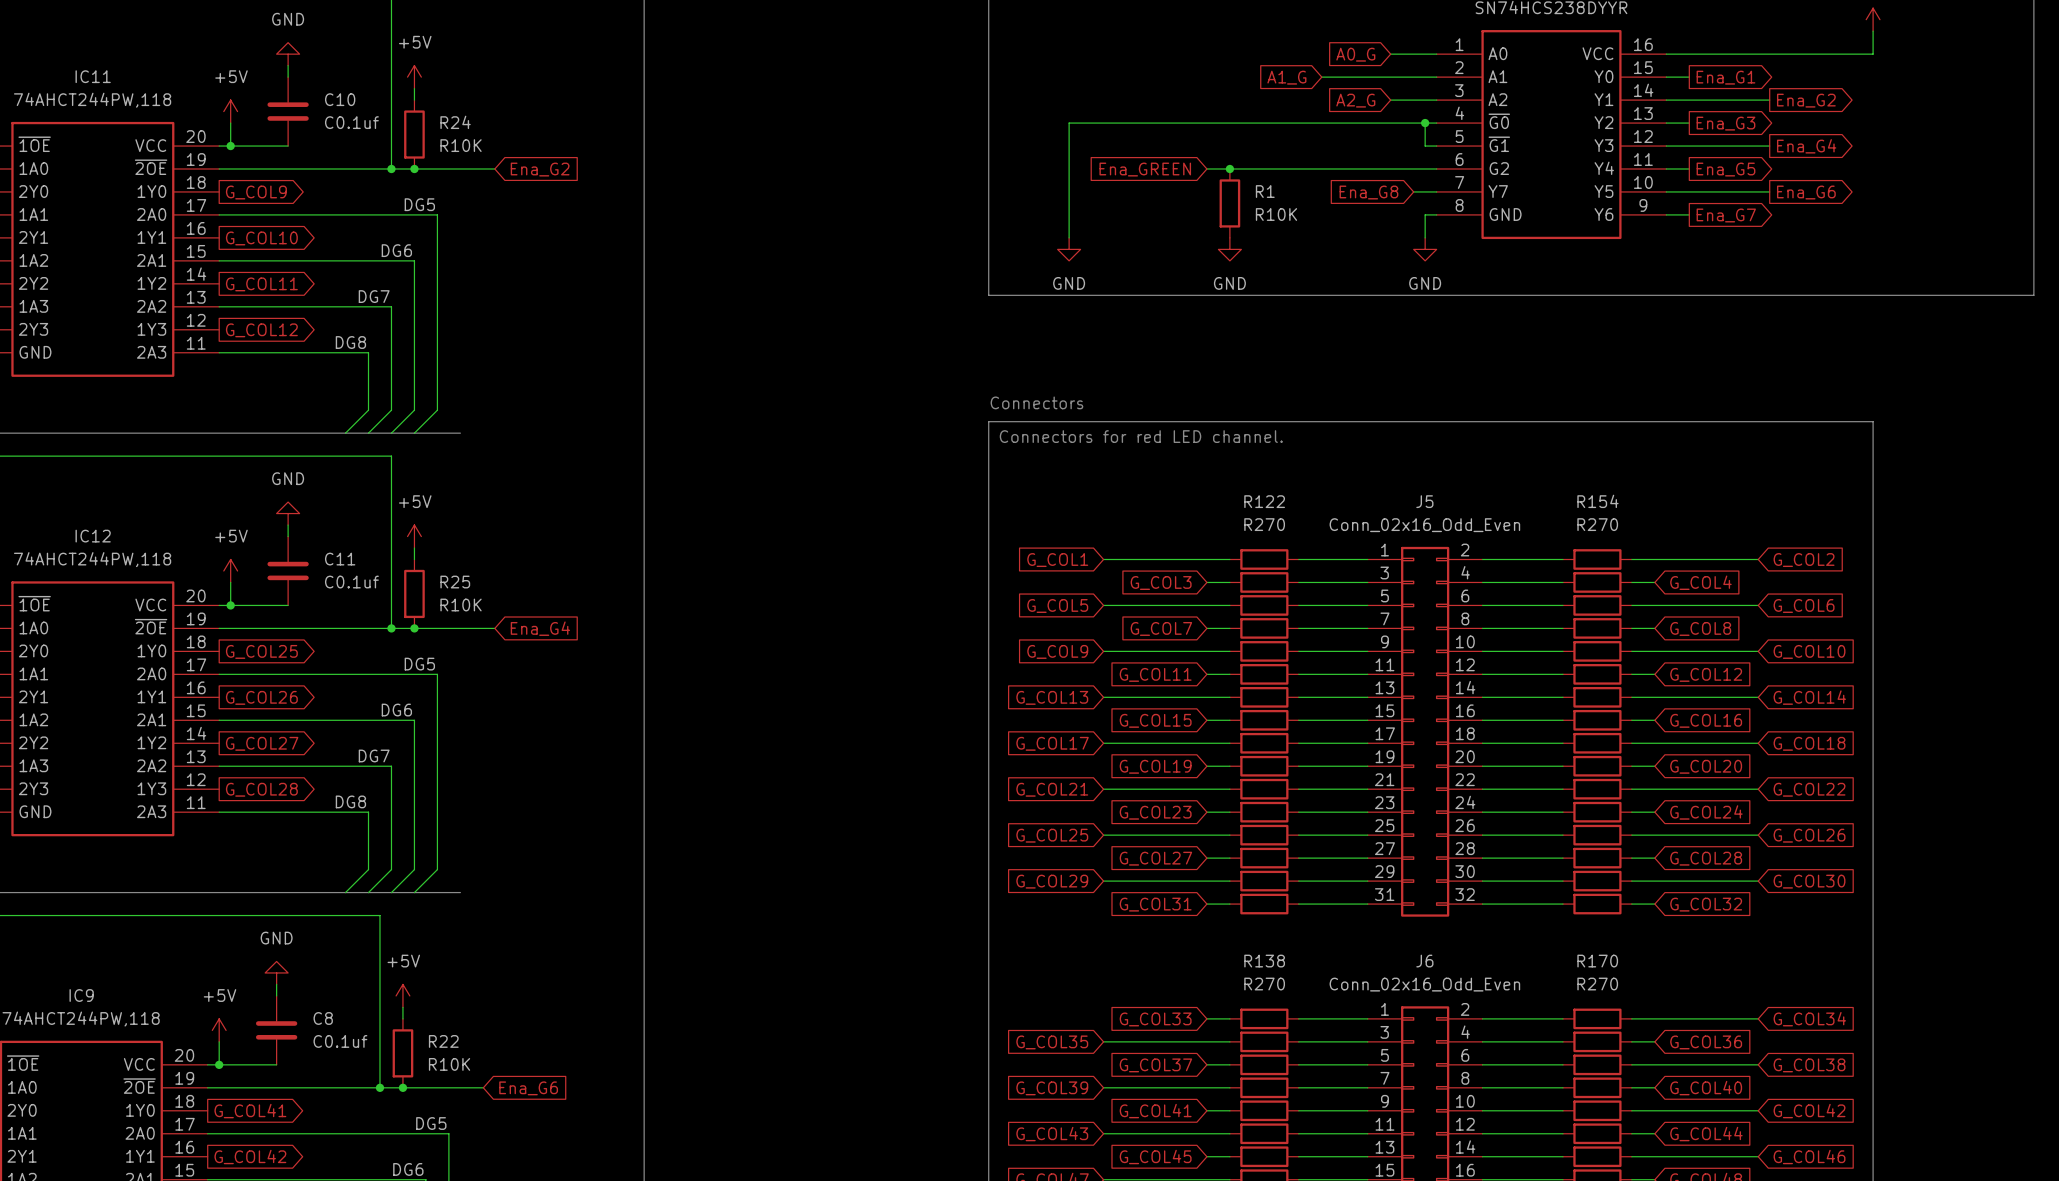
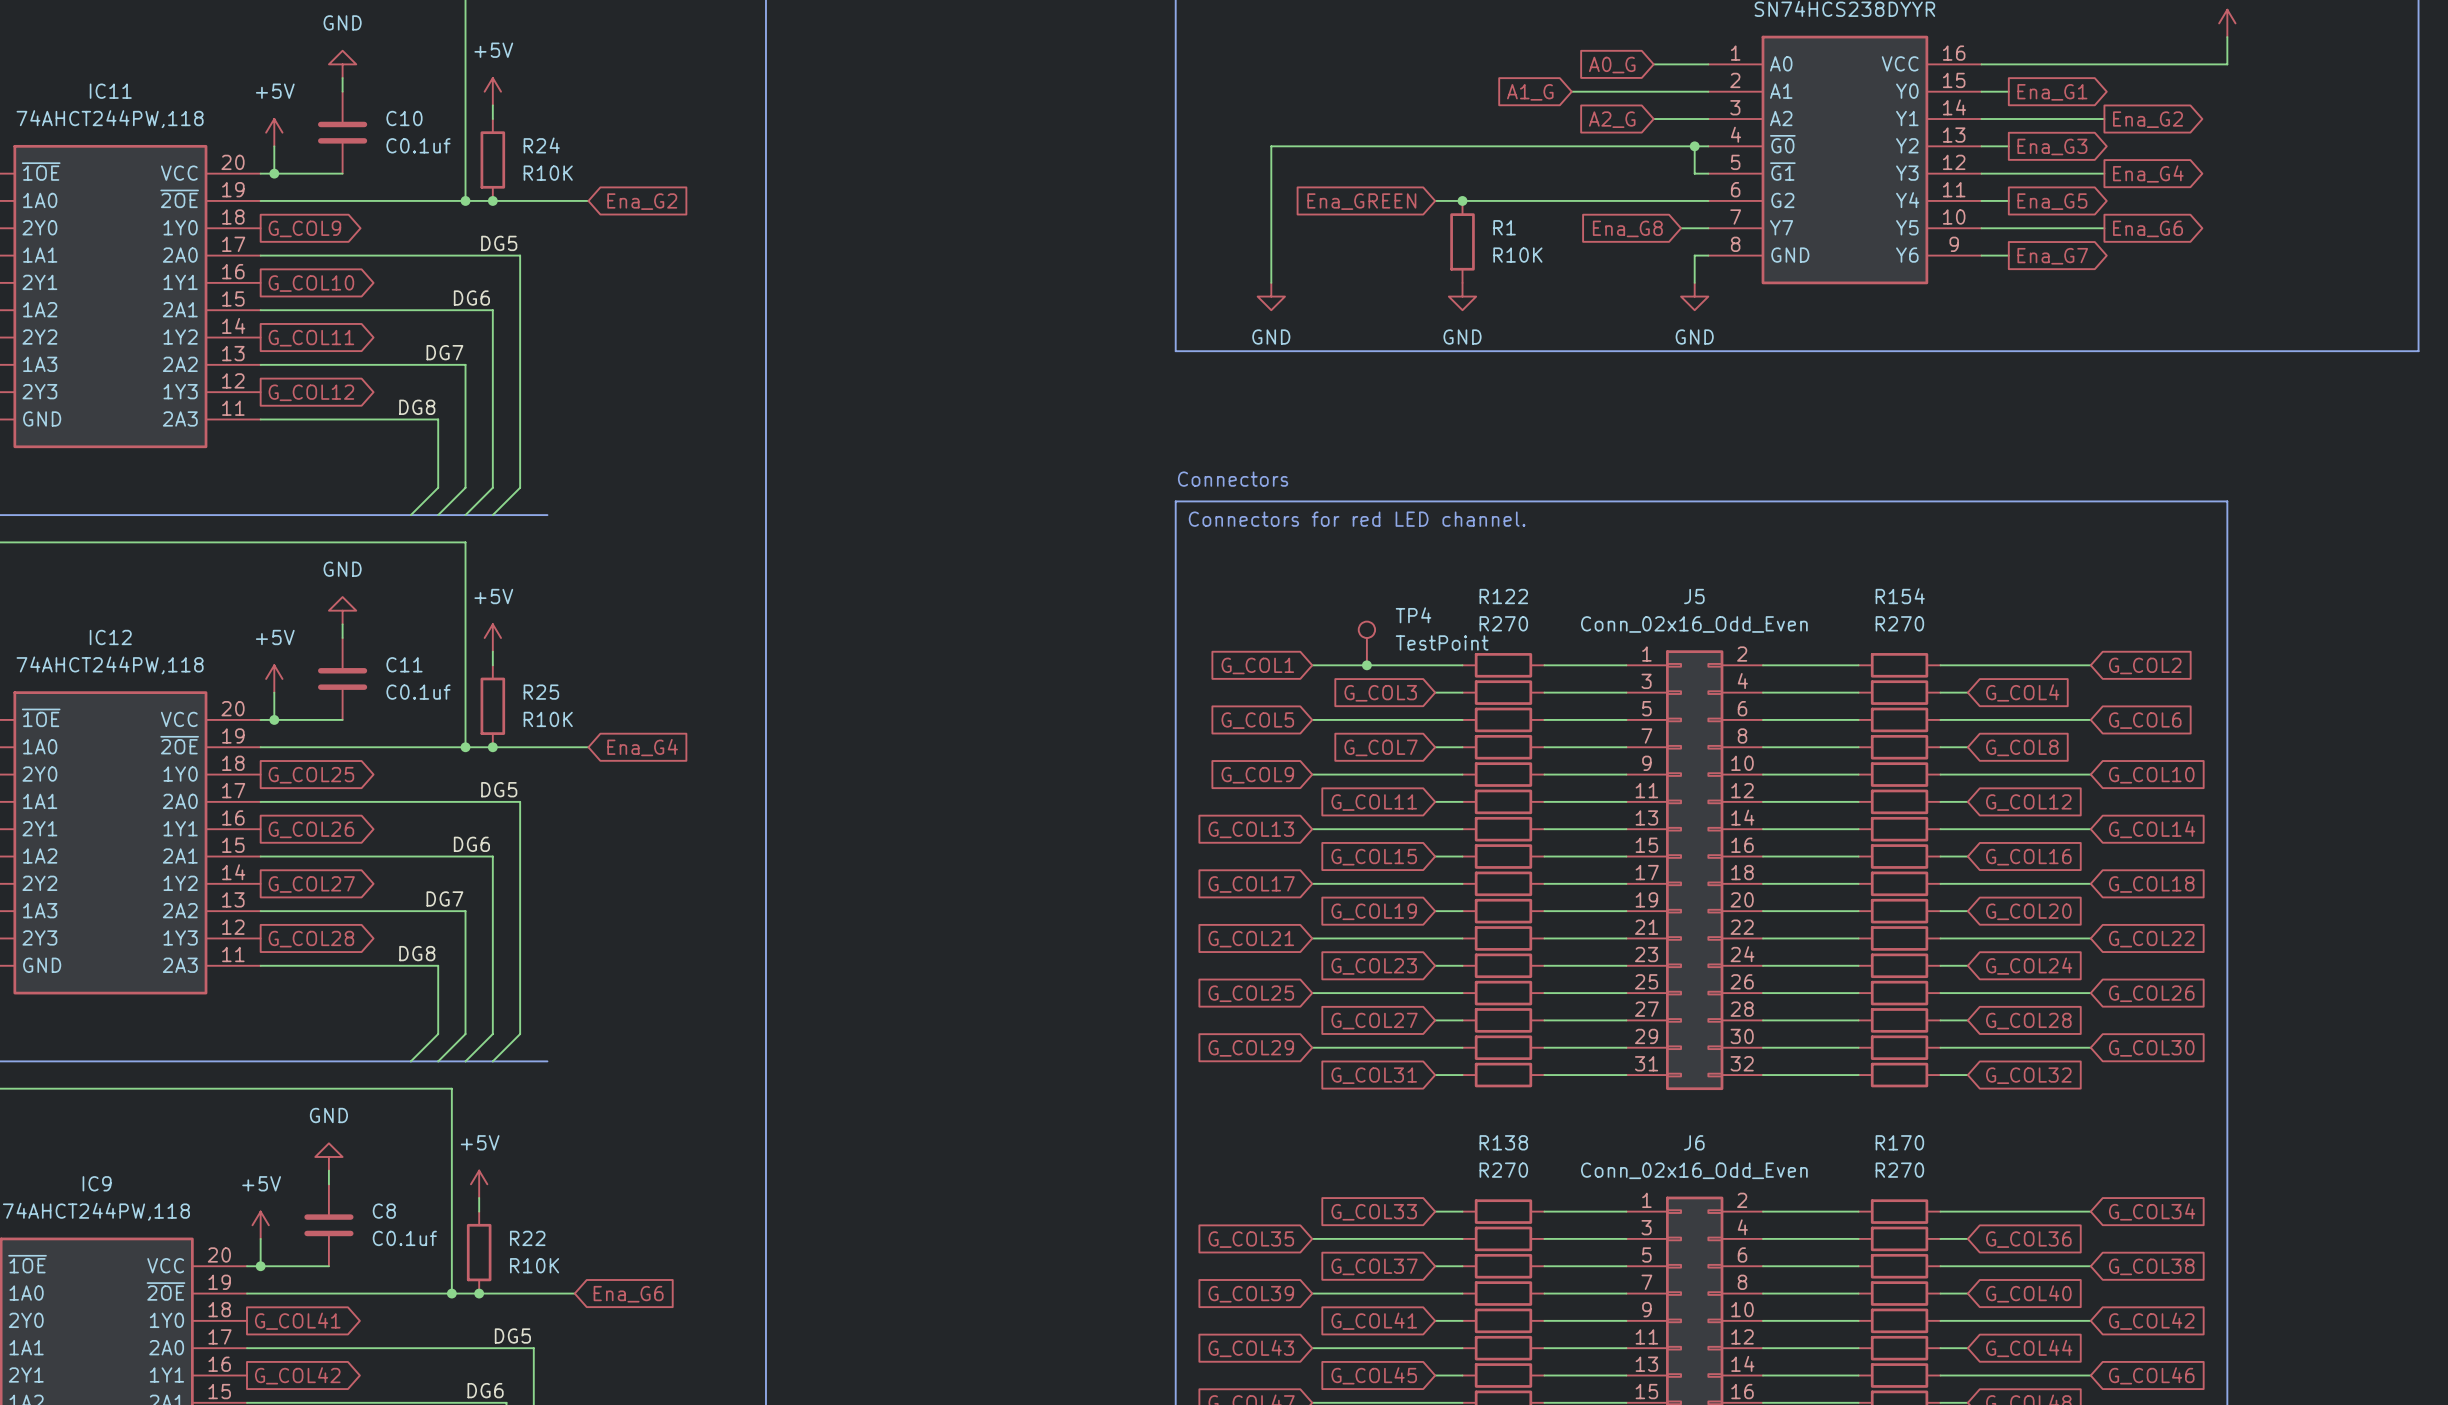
TP4: none -> TestPoint (1366, 643)
junction: none -> (1366, 665)

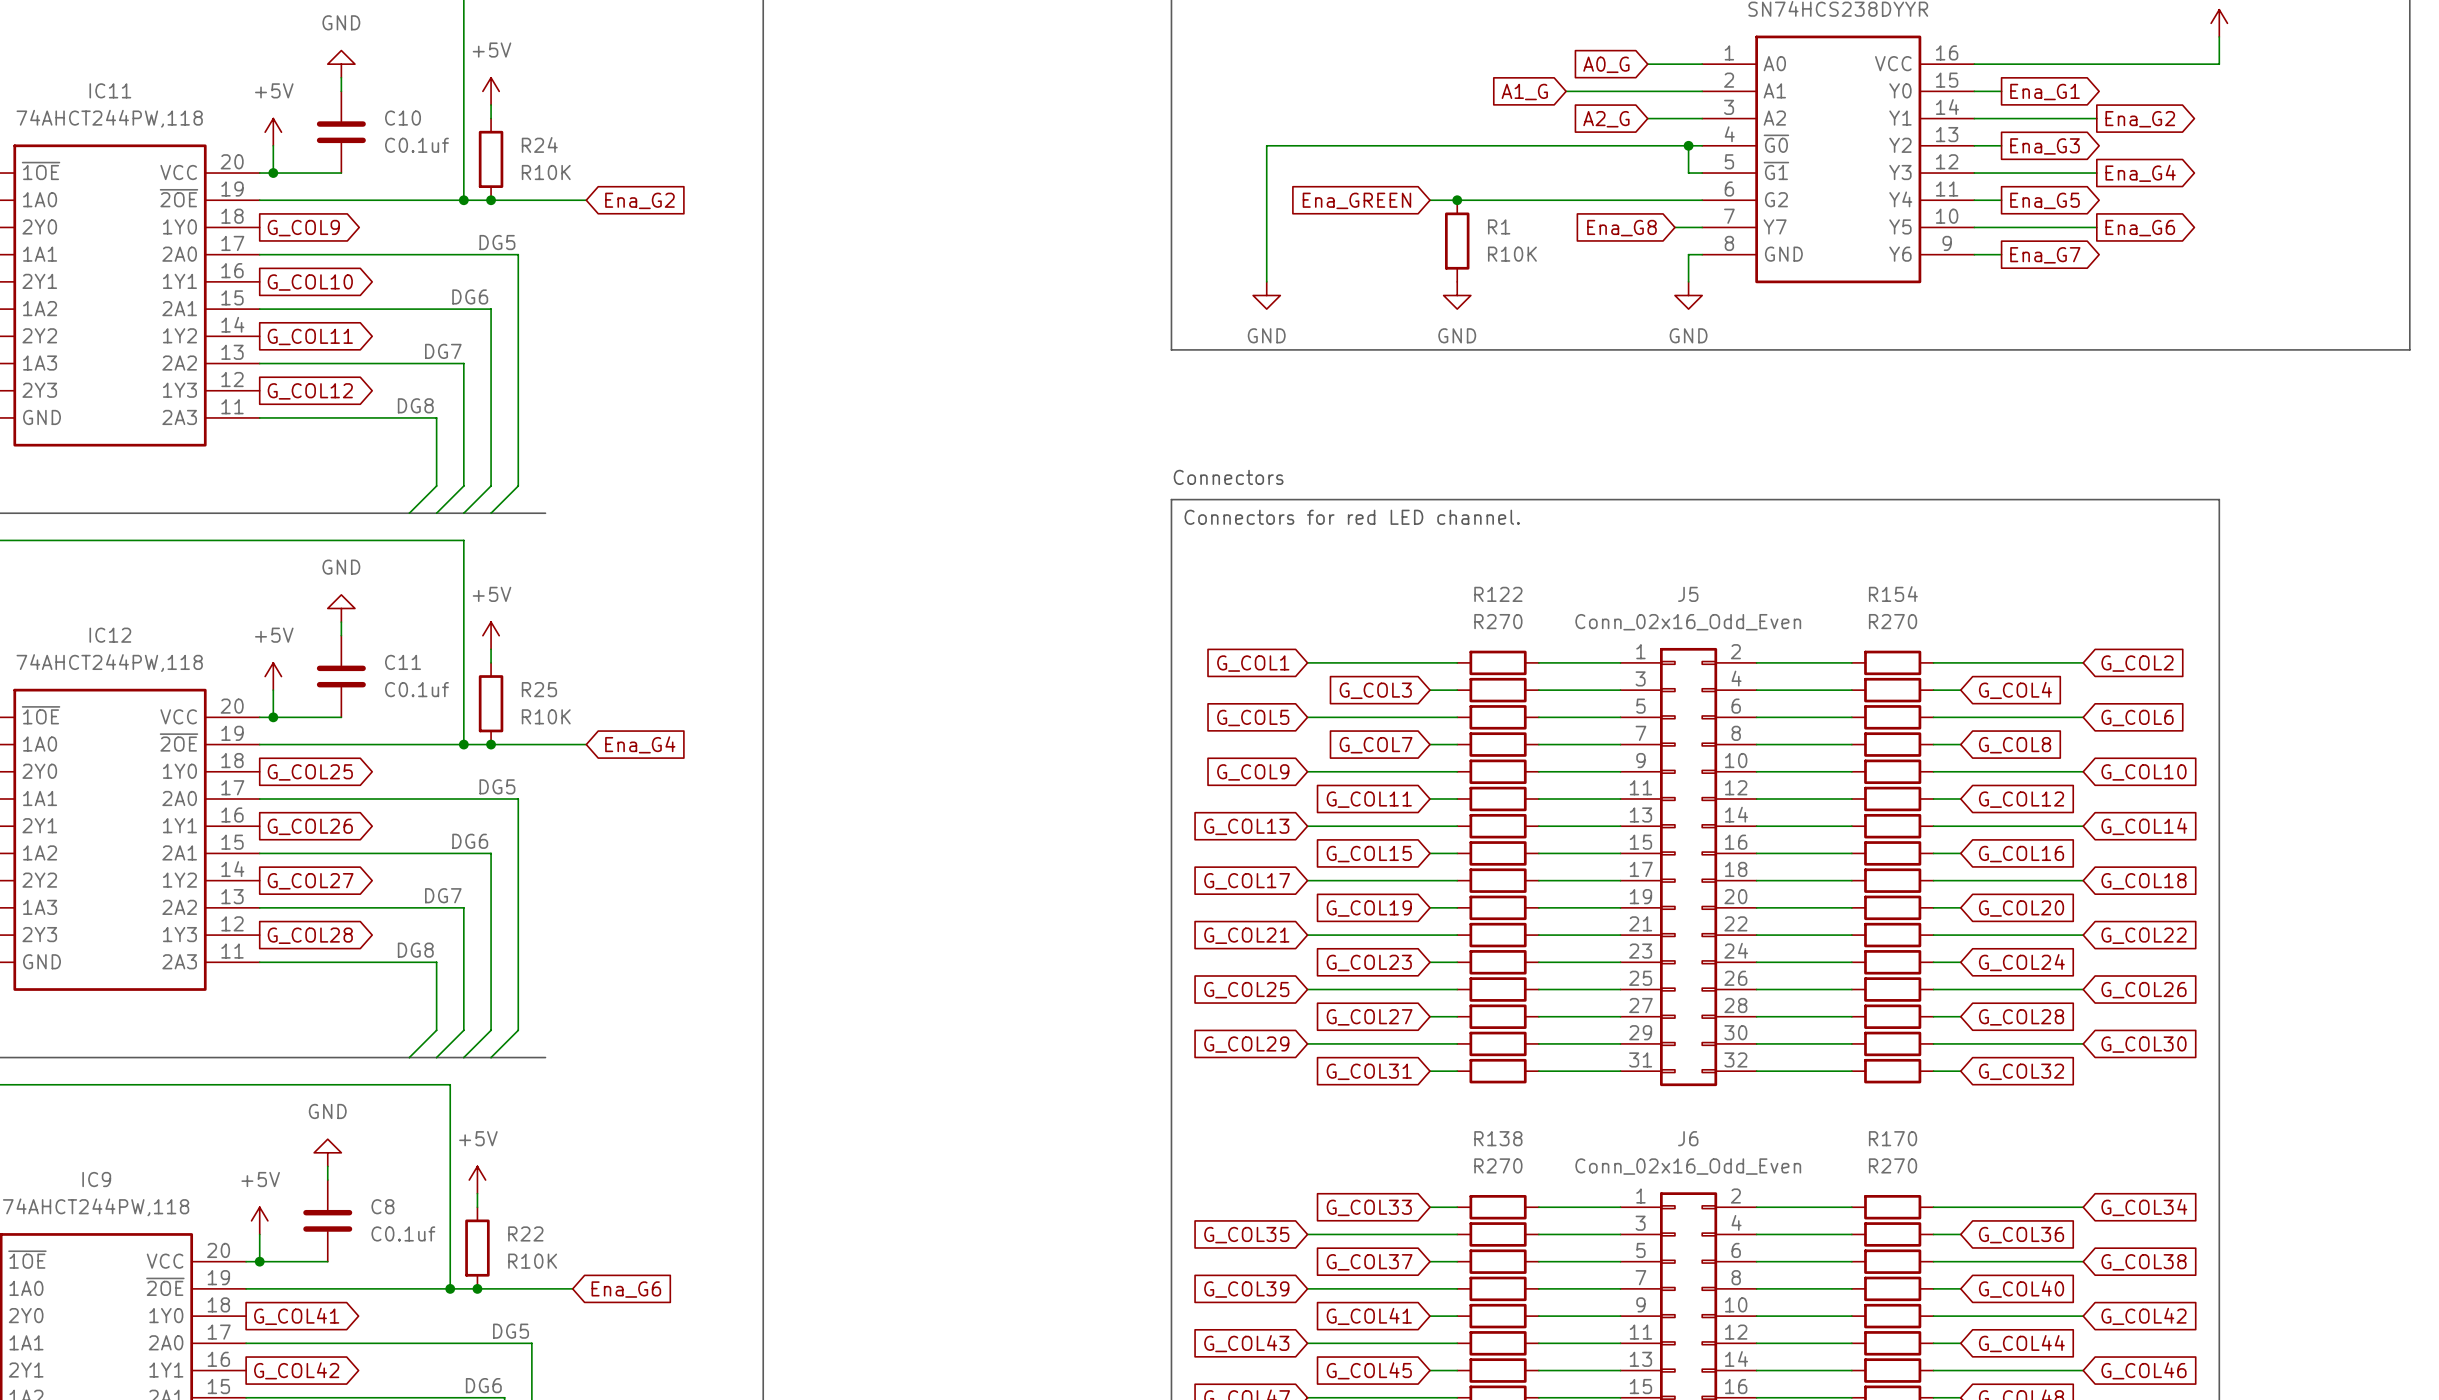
TP4: TestPoint (1366, 643) -> none
junction: (1366, 665) -> none

